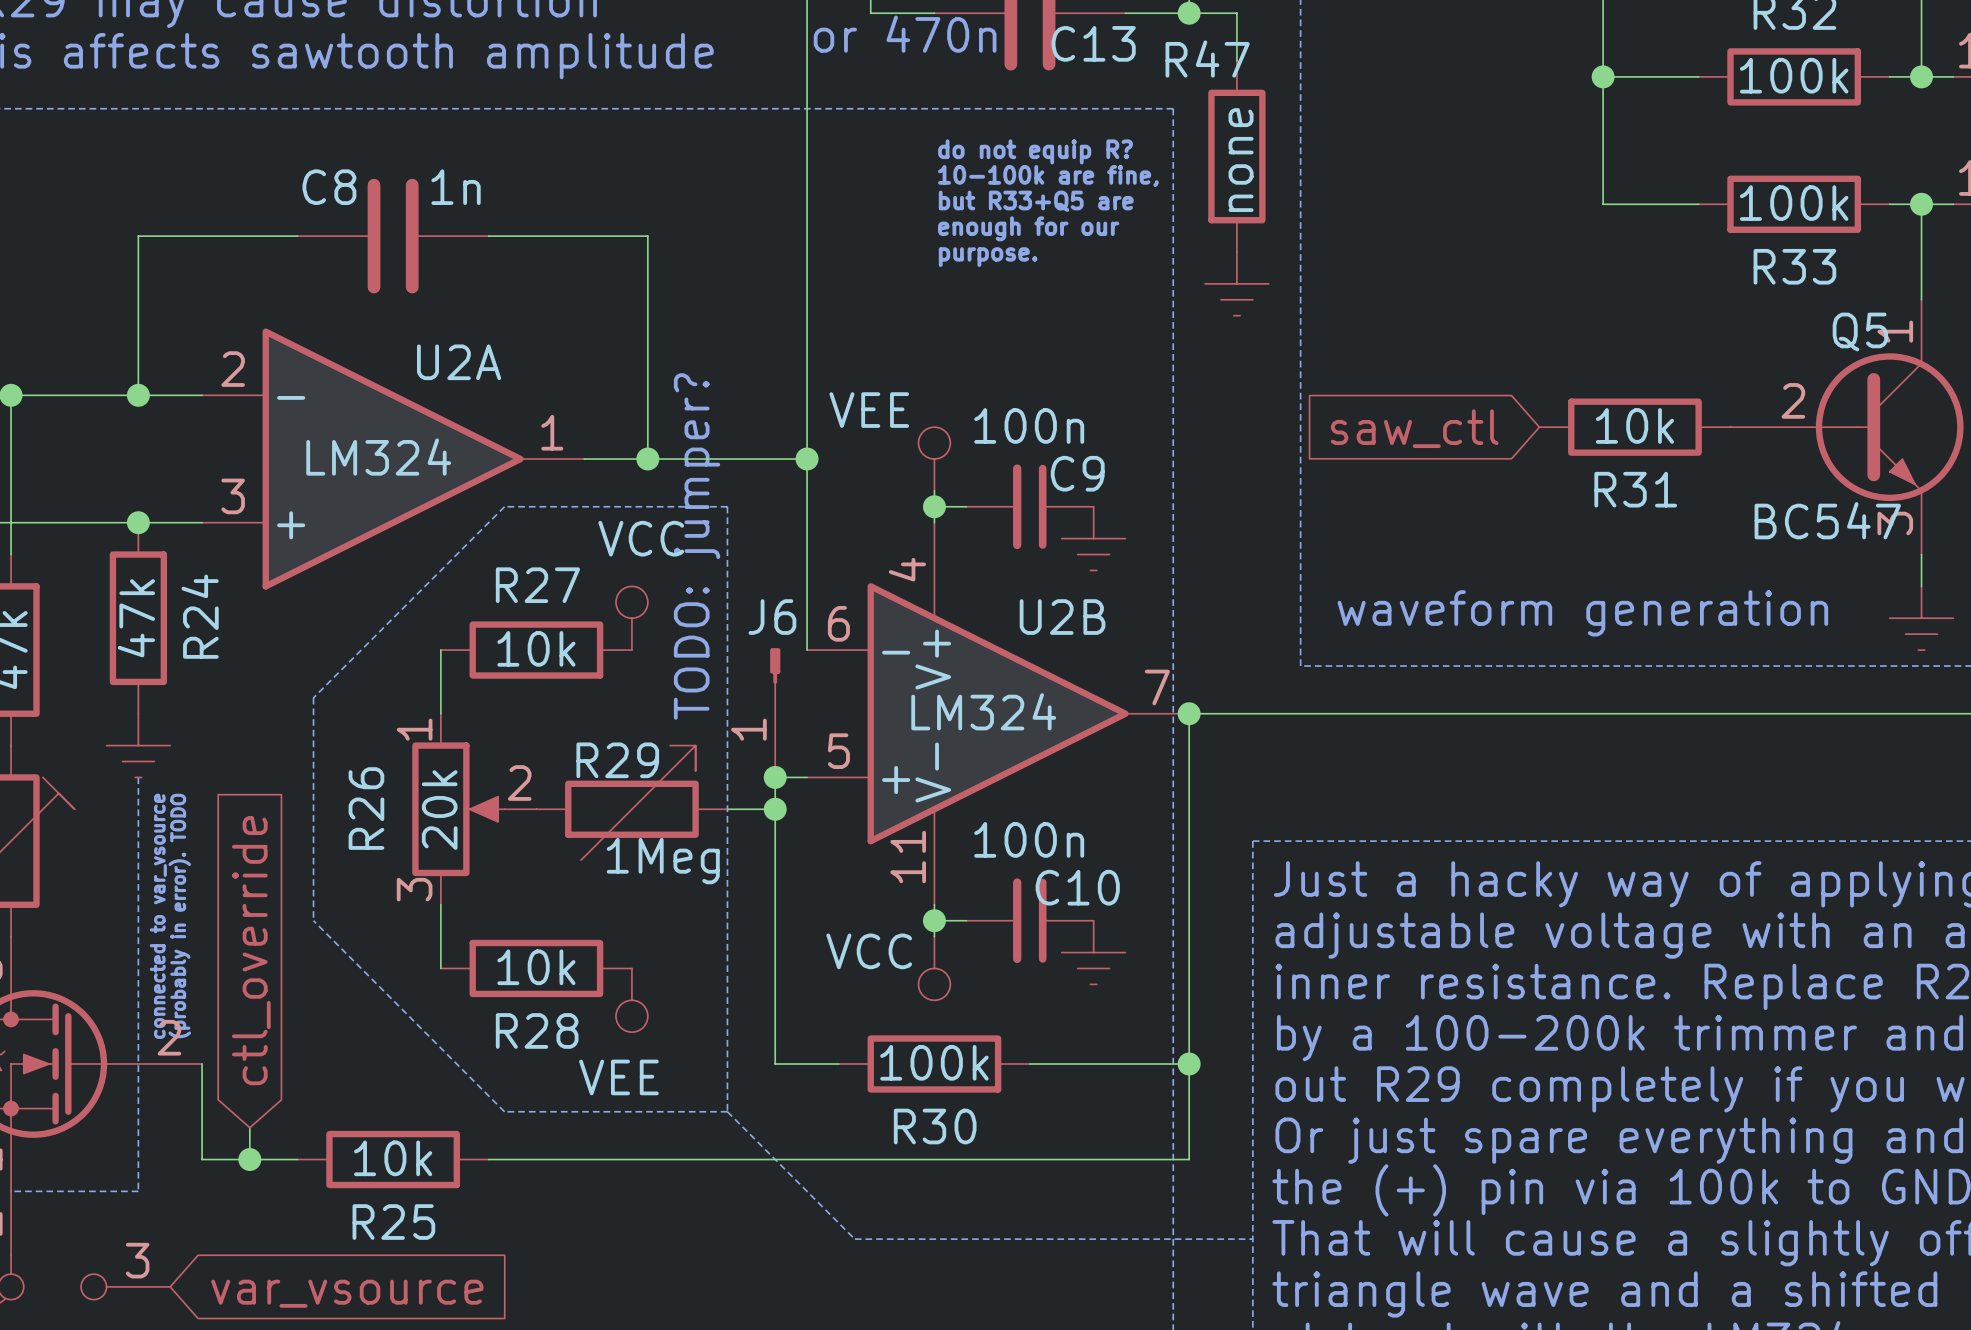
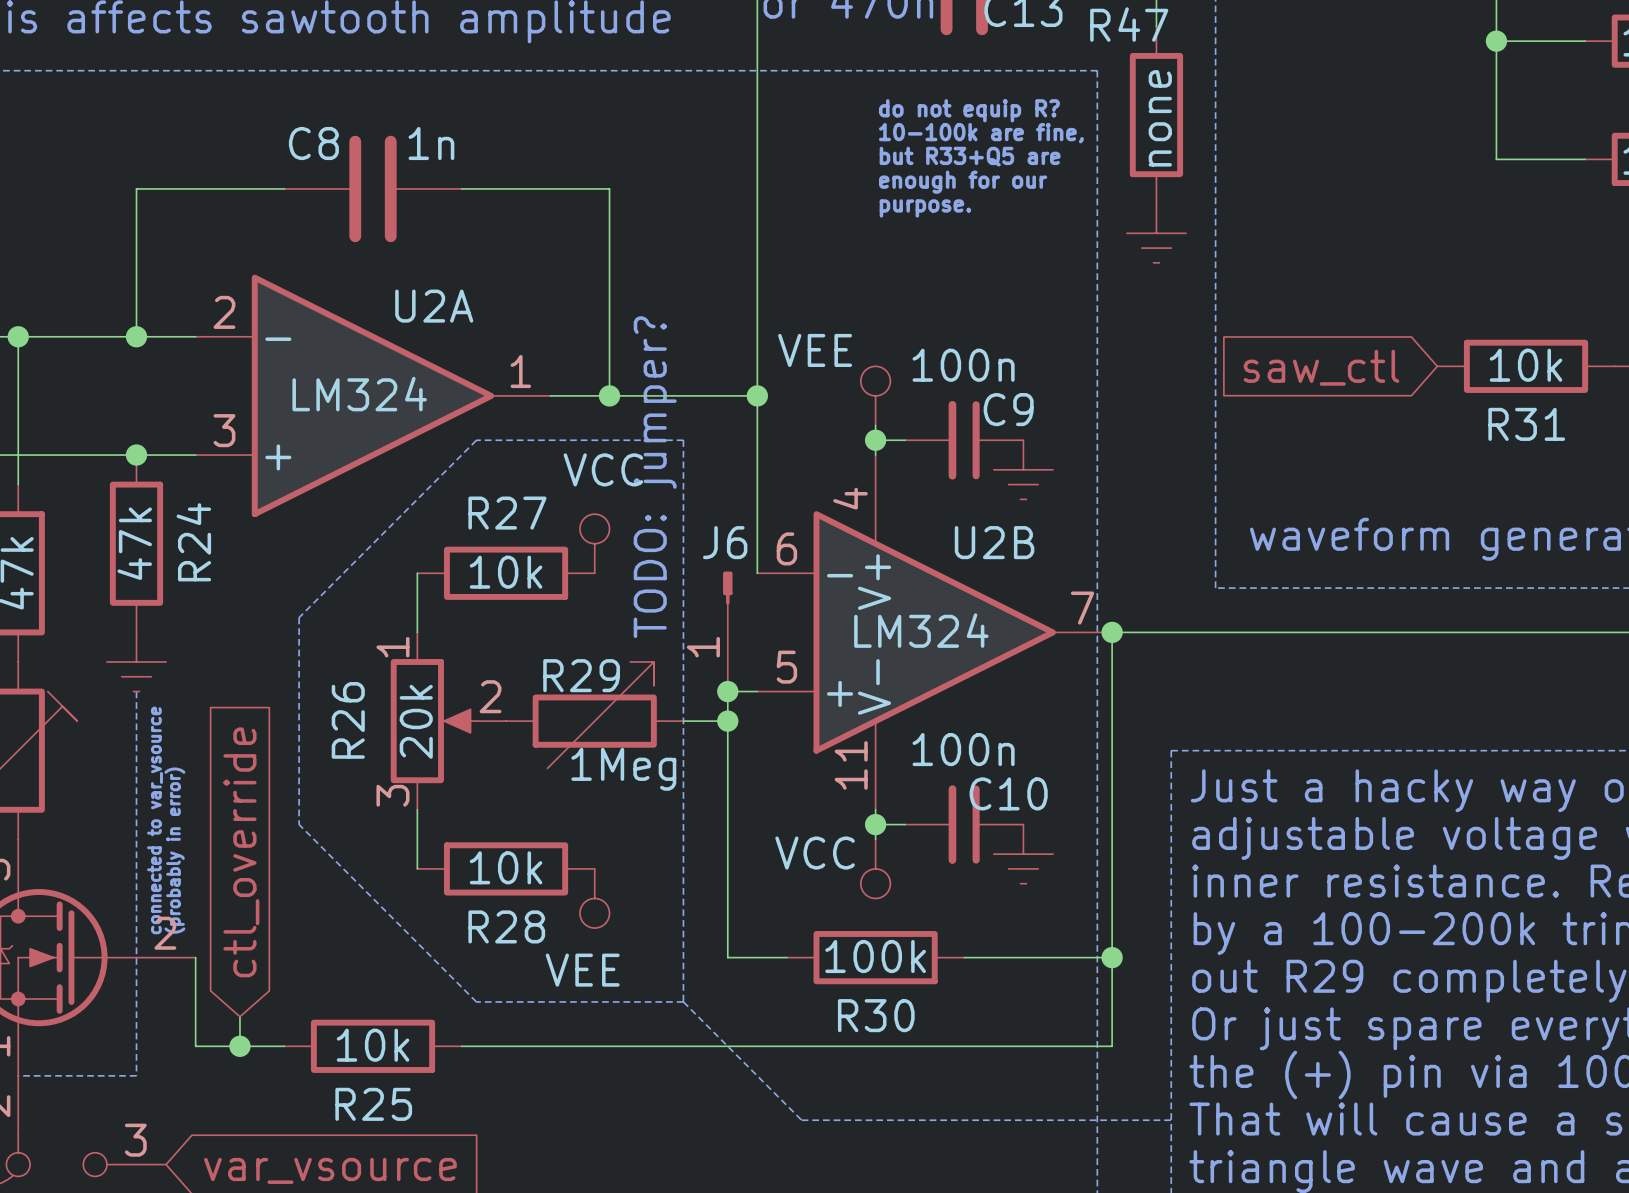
text: (probably in error). TODO (179, 915) -> (probably in error) (174, 850)

